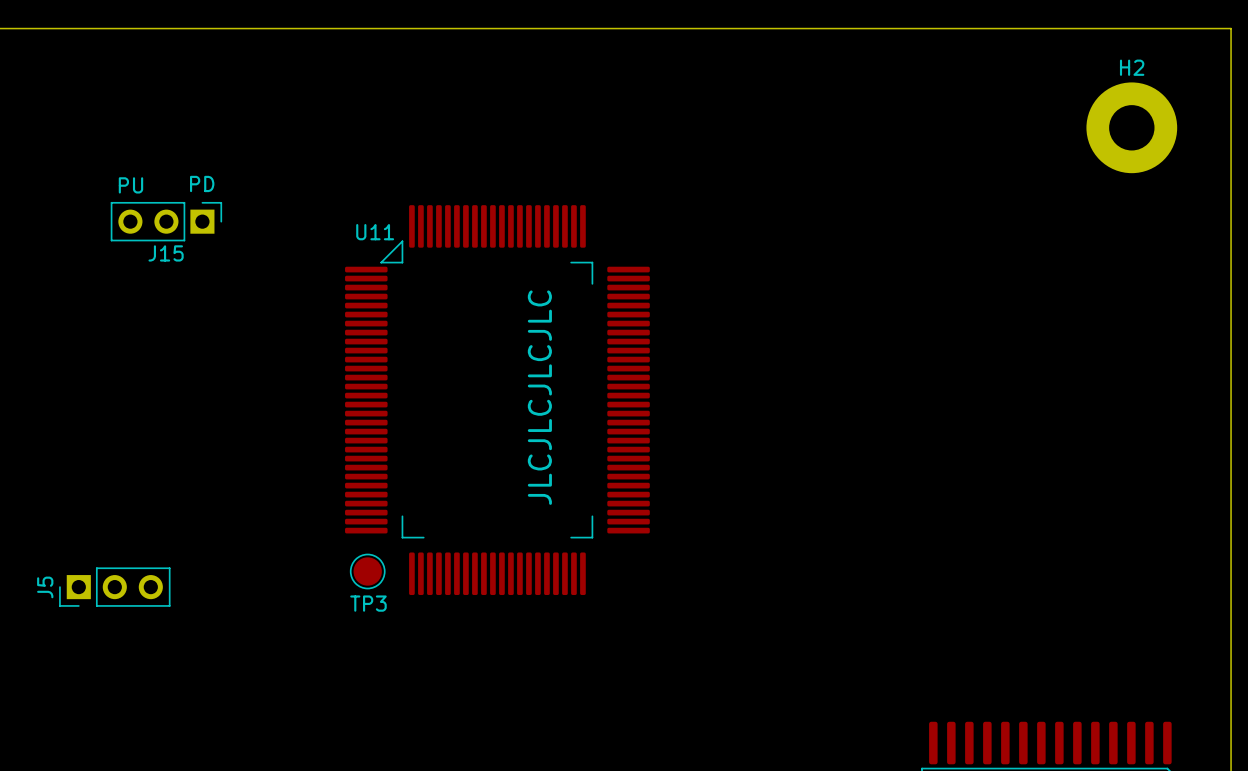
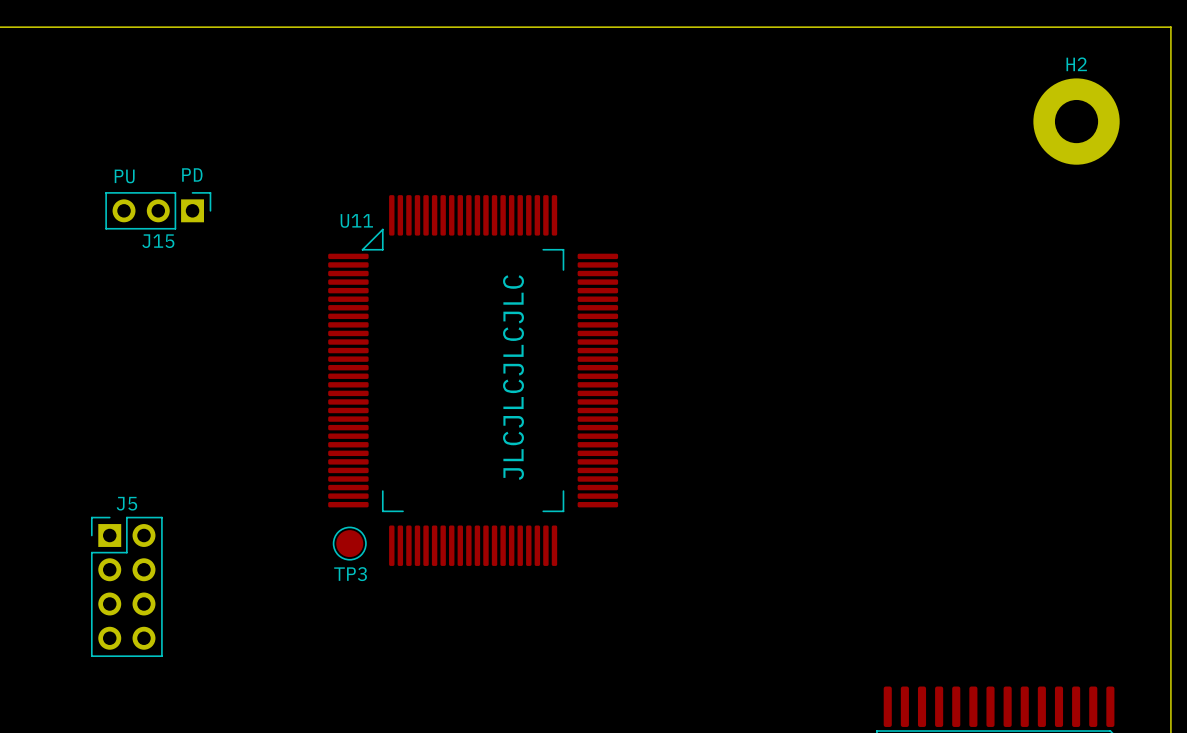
J5 footprint: [59, 567, 171, 607] -> [91, 516, 163, 657]
J5 name position: J5 (45, 587) -> J5 (126, 503)

